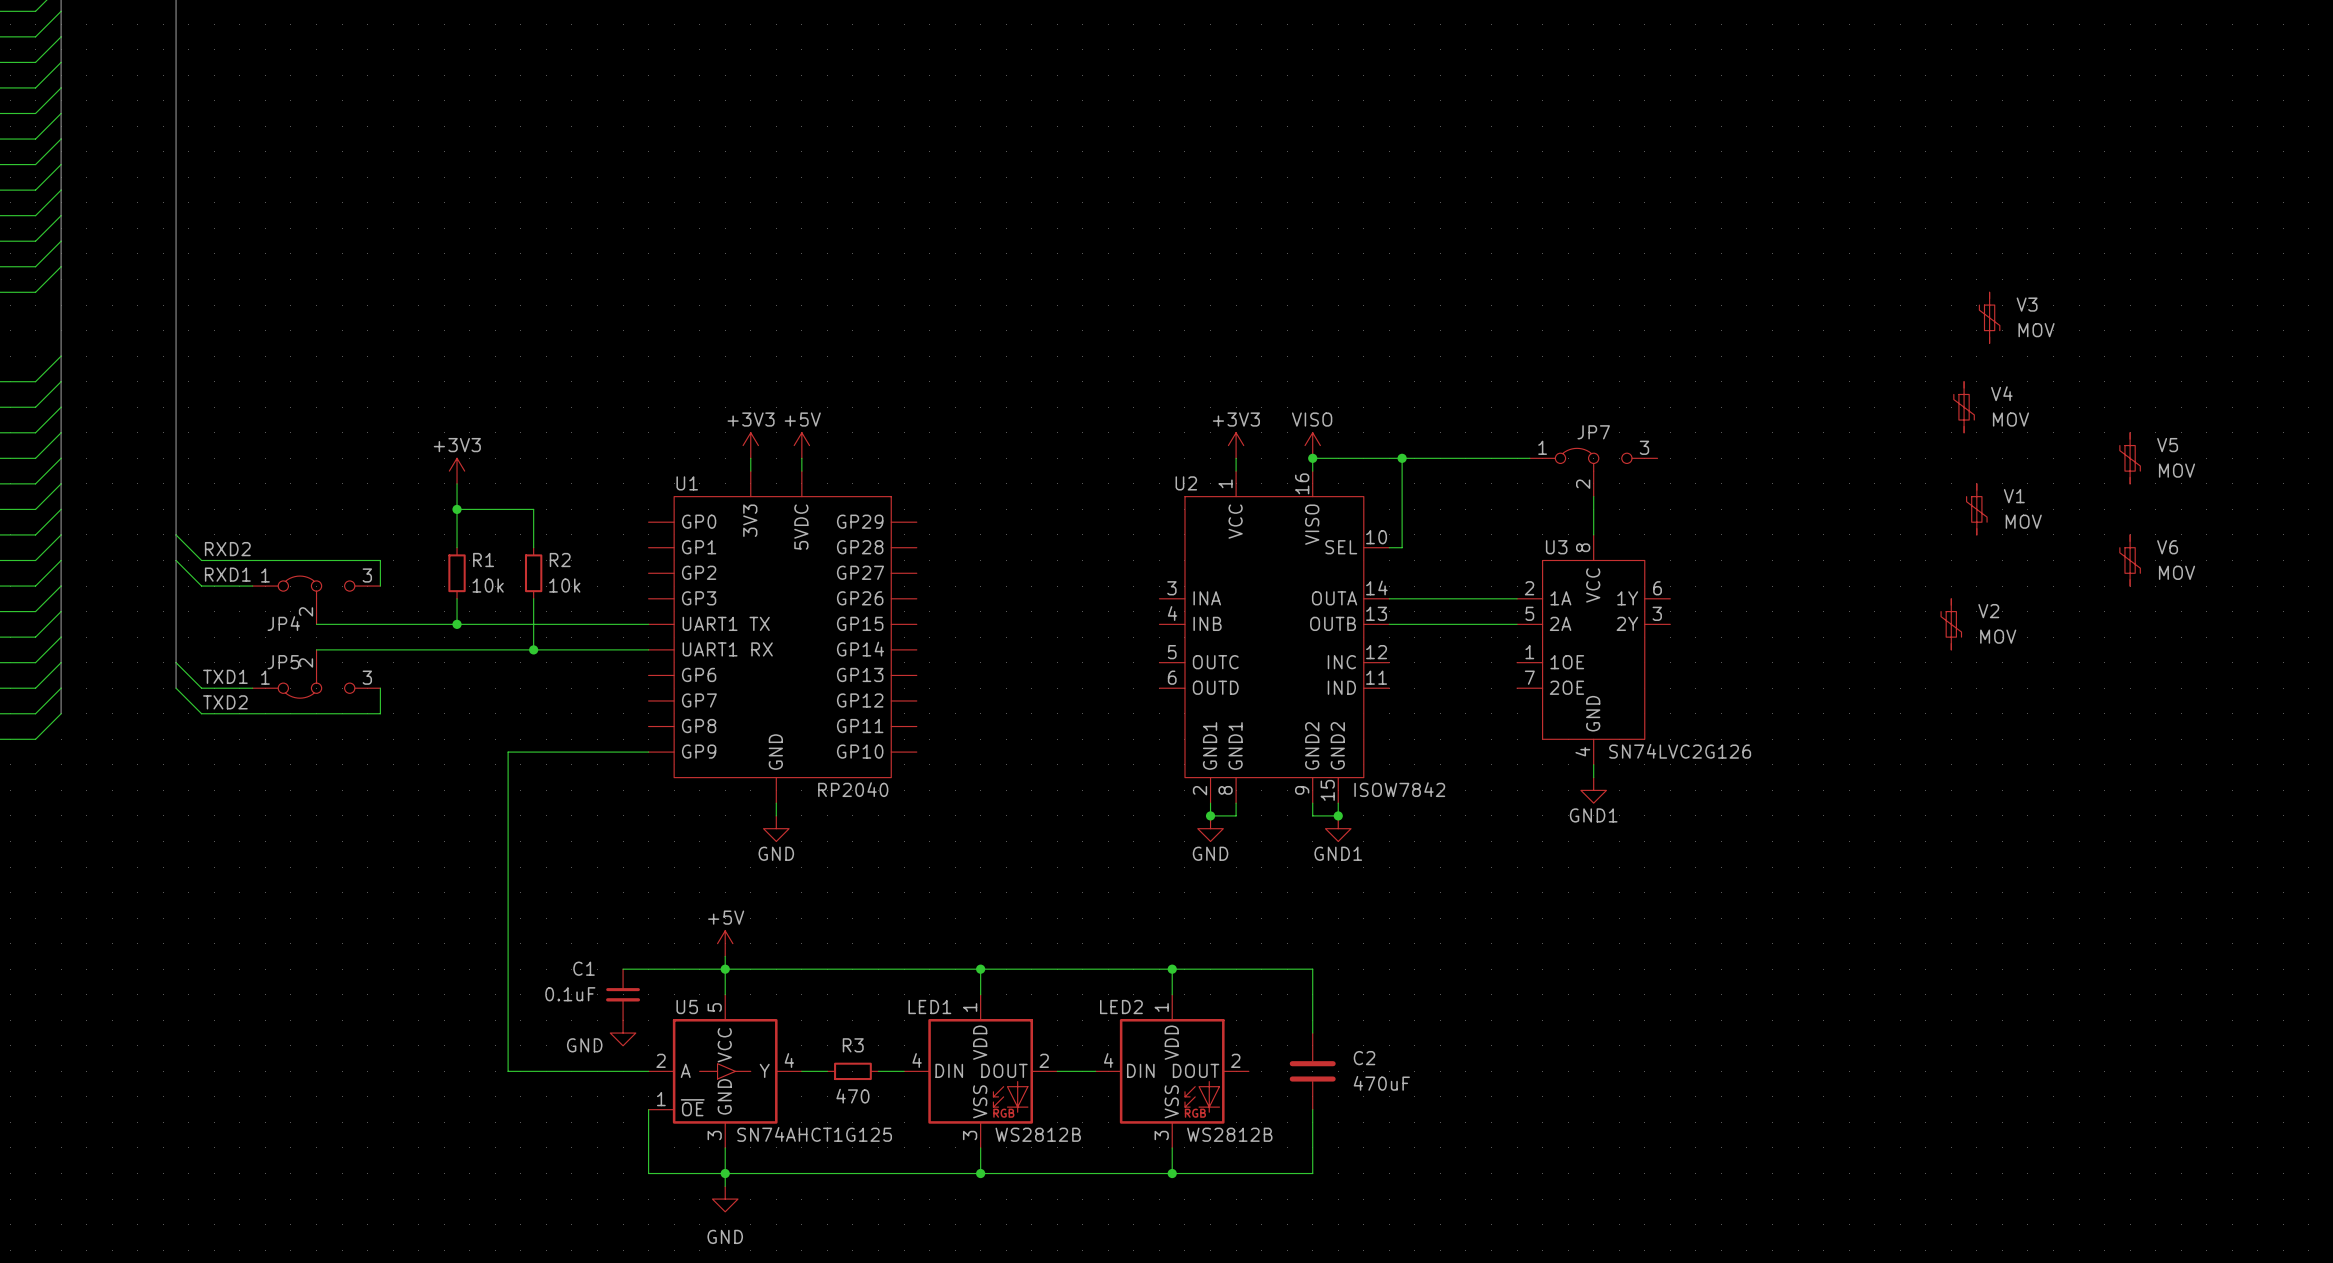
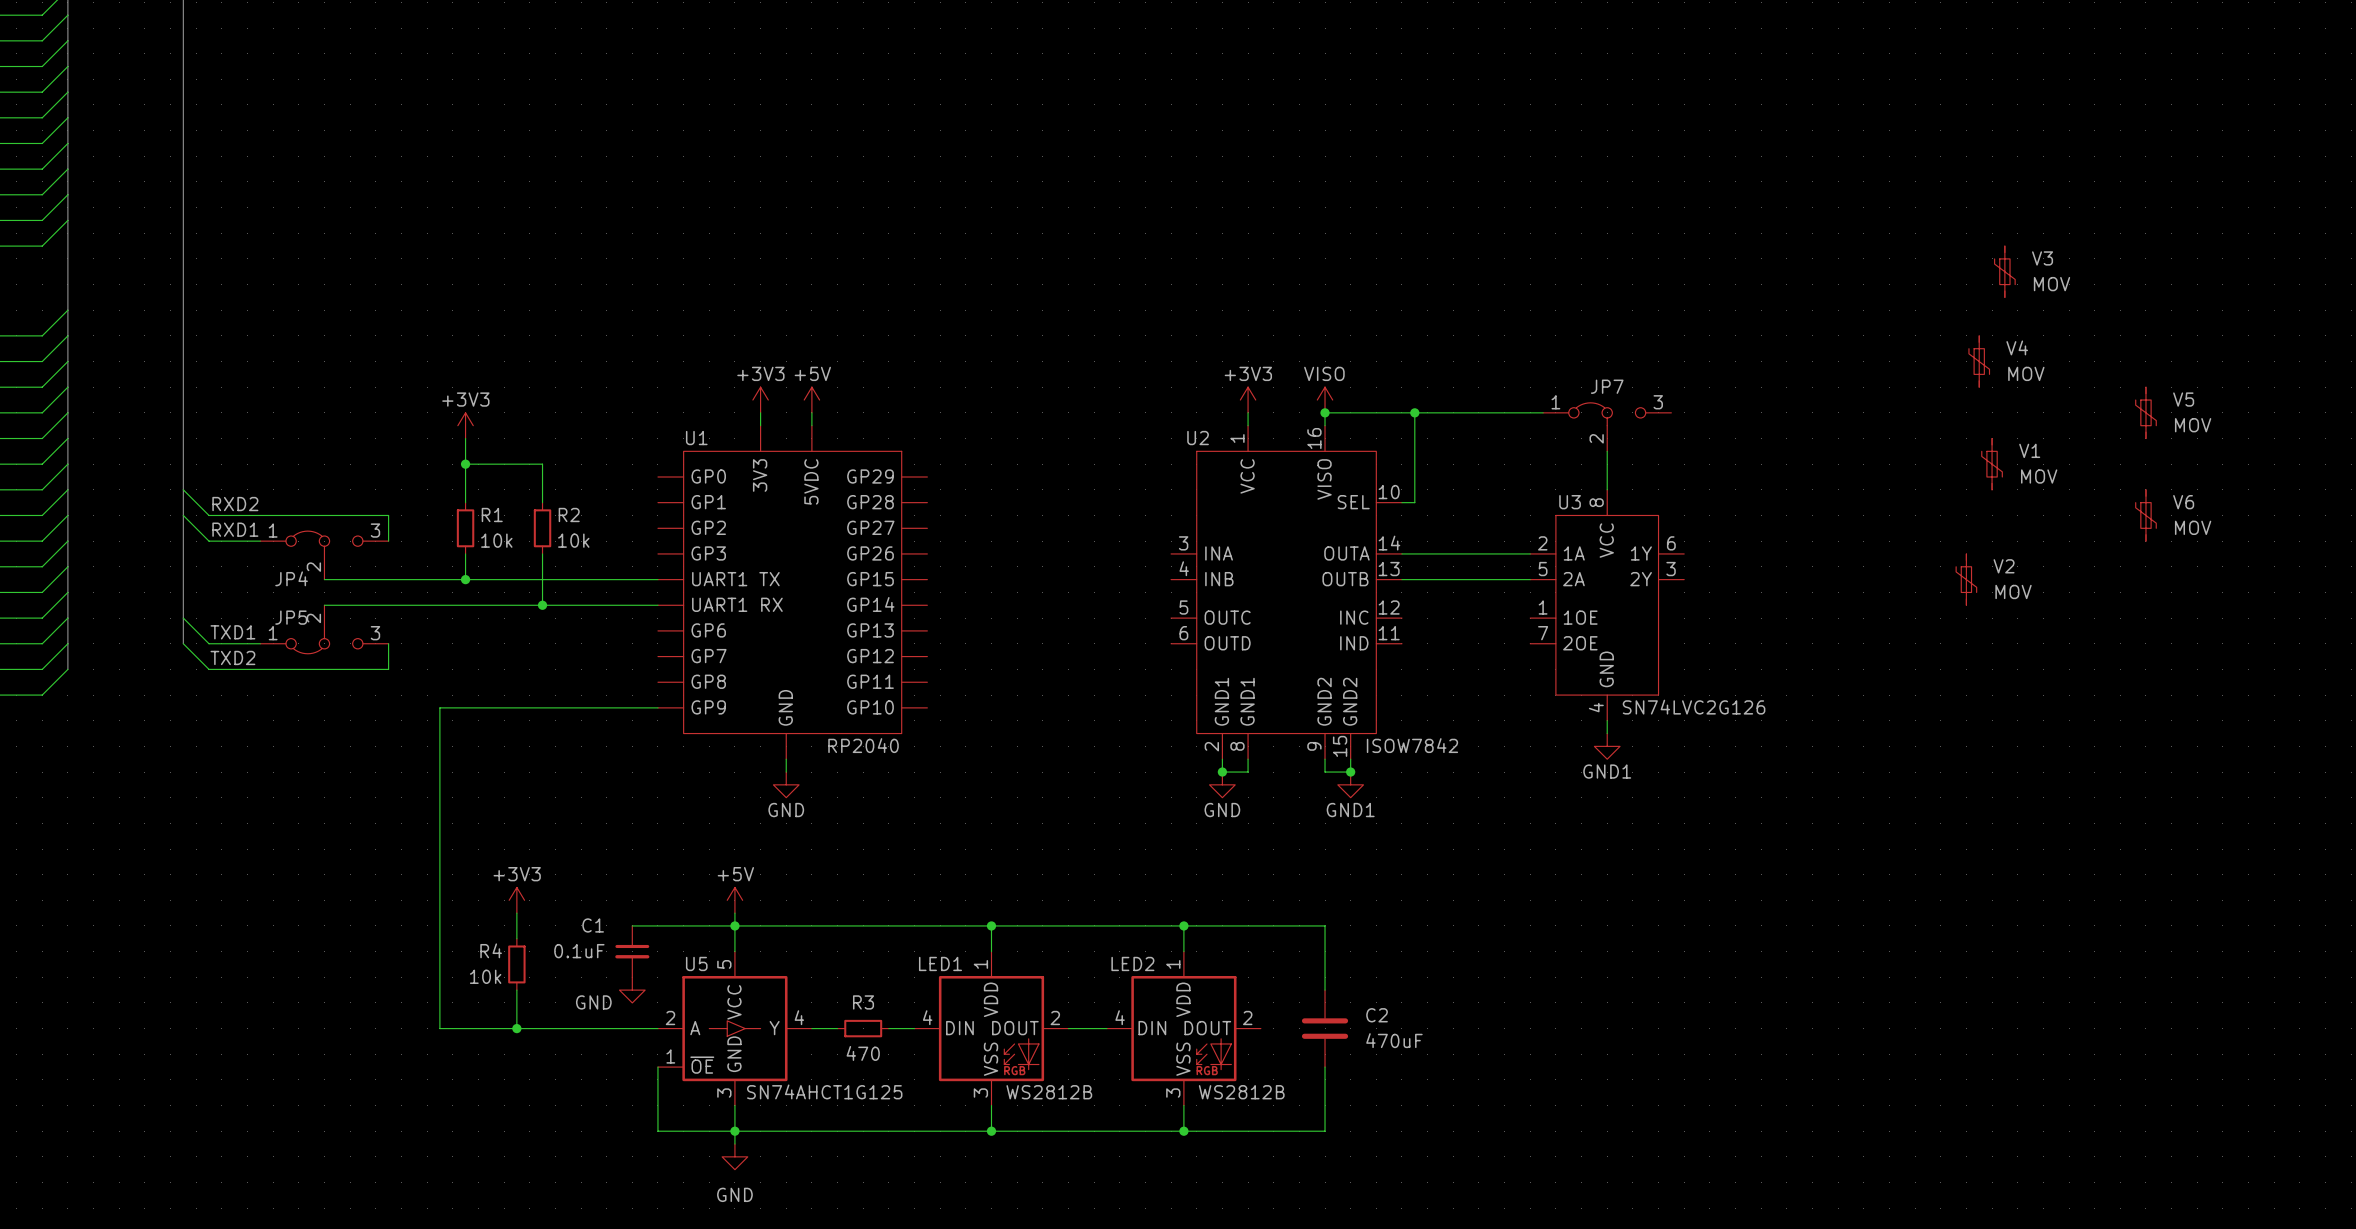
wire: (508, 752) (508, 956) -> (516, 707) (439, 707) (439, 1028) (516, 1028)
power symbol: none -> +3V3 (516, 900)
wire: (508, 981) (508, 1033) -> none
R4: none -> 10k (516, 964)
junction: none -> (516, 1028)

